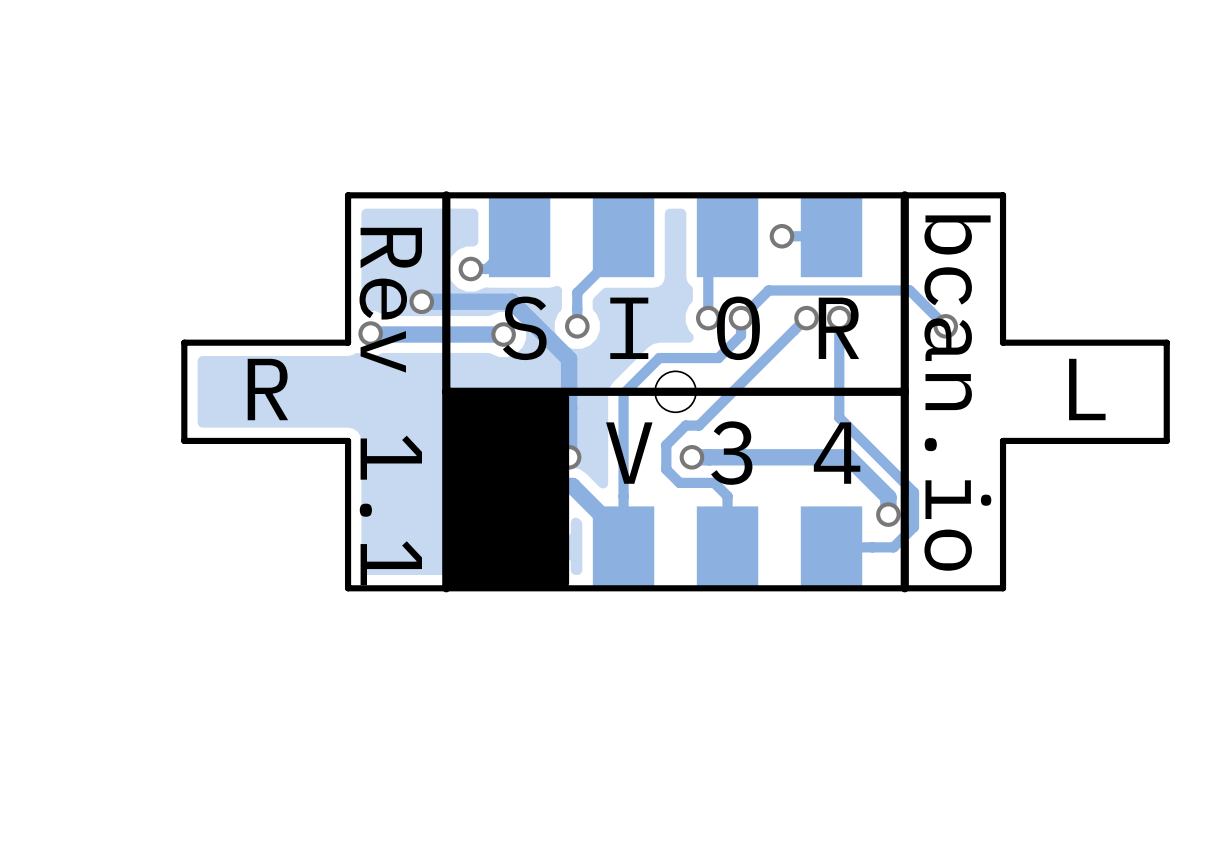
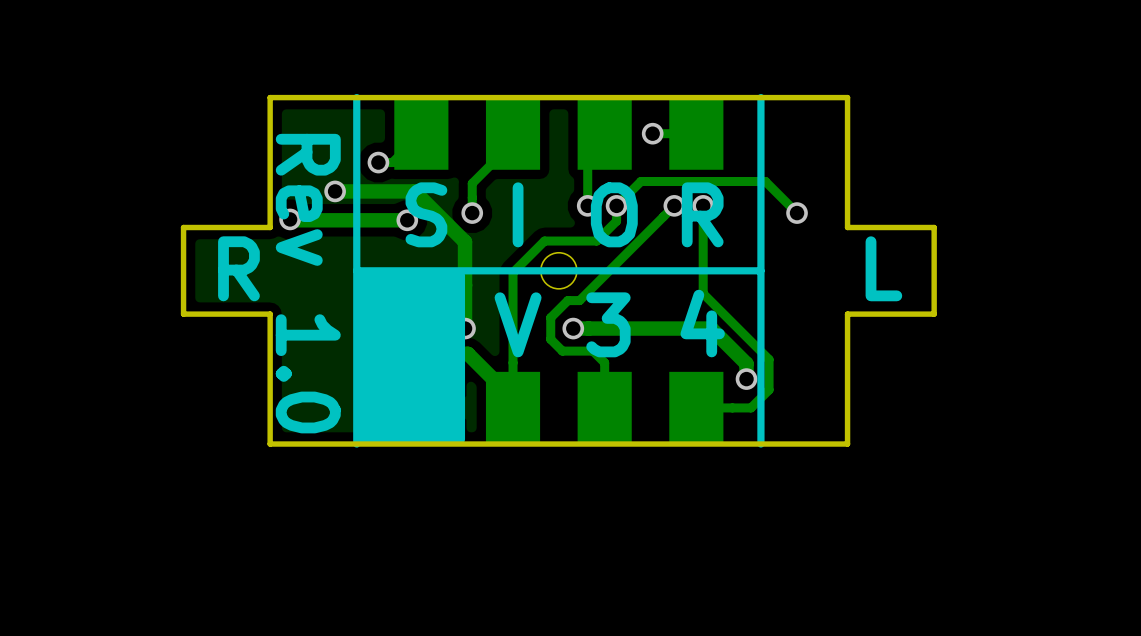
board edge: (249, 342) (184, 342) (184, 440) (249, 440) -> (183, 227) (183, 314)
board edge: (1101, 342) (1166, 342) (1166, 440) (1101, 440) -> (934, 227) (934, 314)
text position: R (267, 389) -> R (238, 268)
text position: L (1087, 389) -> L (883, 268)
text: bcan.io (957, 393) -> none
text: Rev 1.1 (390, 406) -> Rev 1.0 (308, 283)

